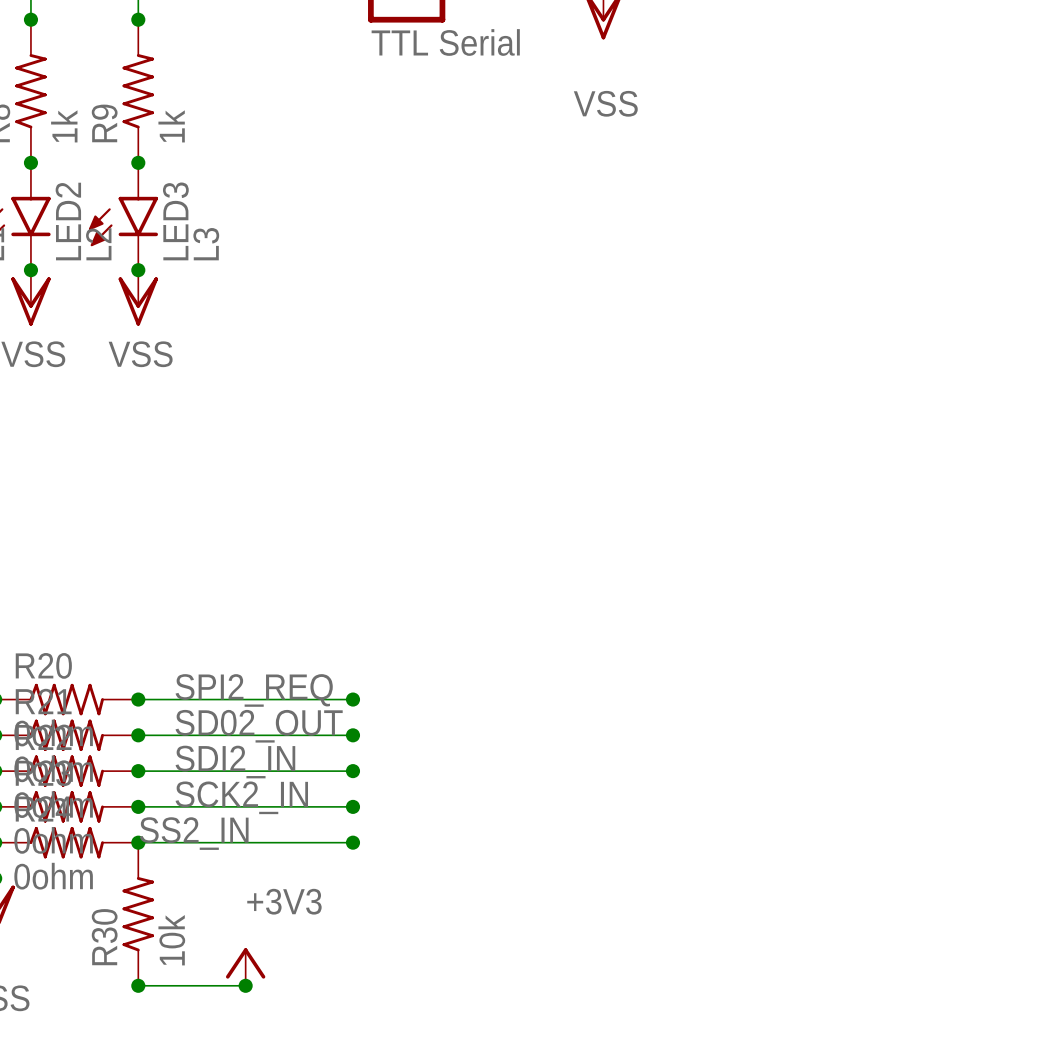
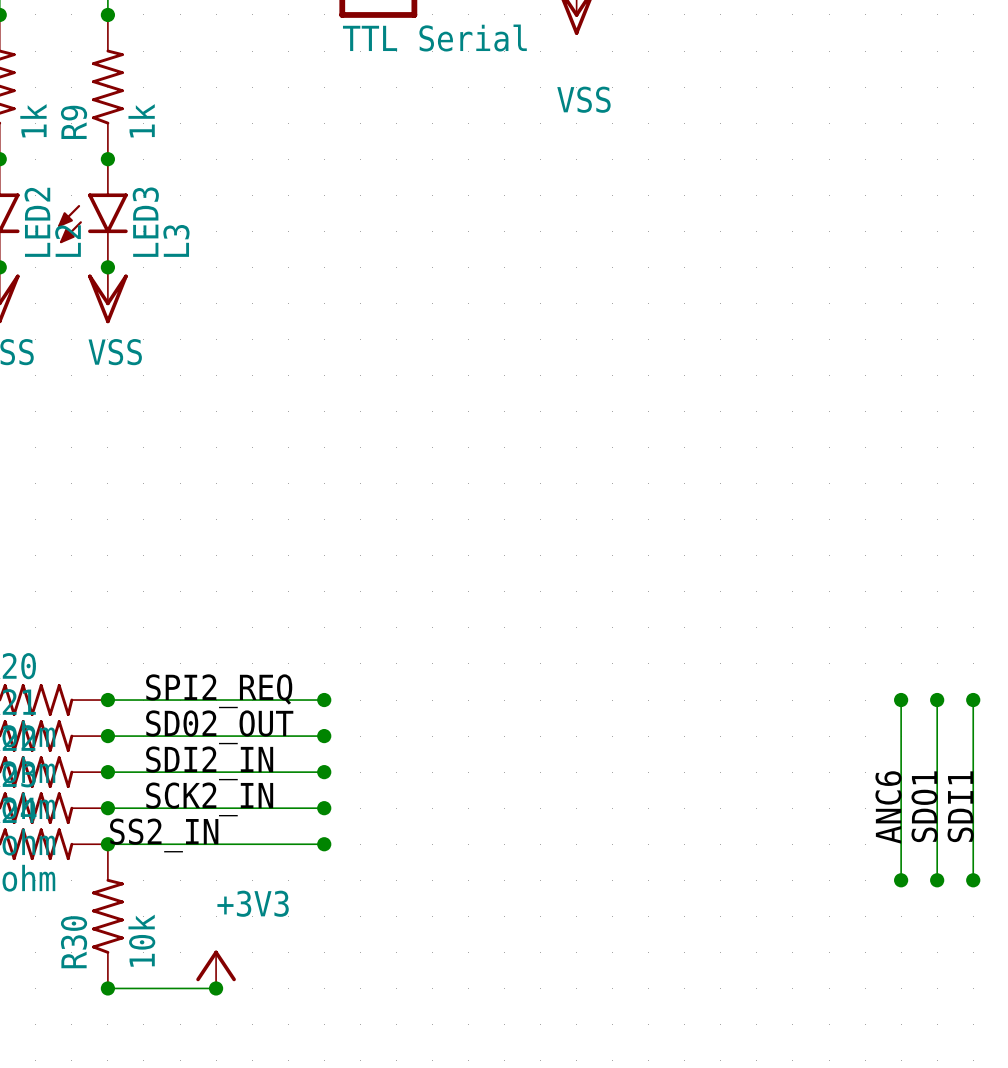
wire: none -> (901, 700) (901, 880)
junction: none -> (901, 700)
wire: none -> (937, 700) (937, 880)
junction: none -> (937, 700)
wire: none -> (973, 700) (973, 880)
junction: none -> (973, 700)
label: none -> SDO1 (924, 806)
label: none -> ANC6 (888, 807)
label: none -> SDI1 (960, 806)
junction: none -> (901, 880)
junction: none -> (937, 880)
junction: none -> (973, 880)

